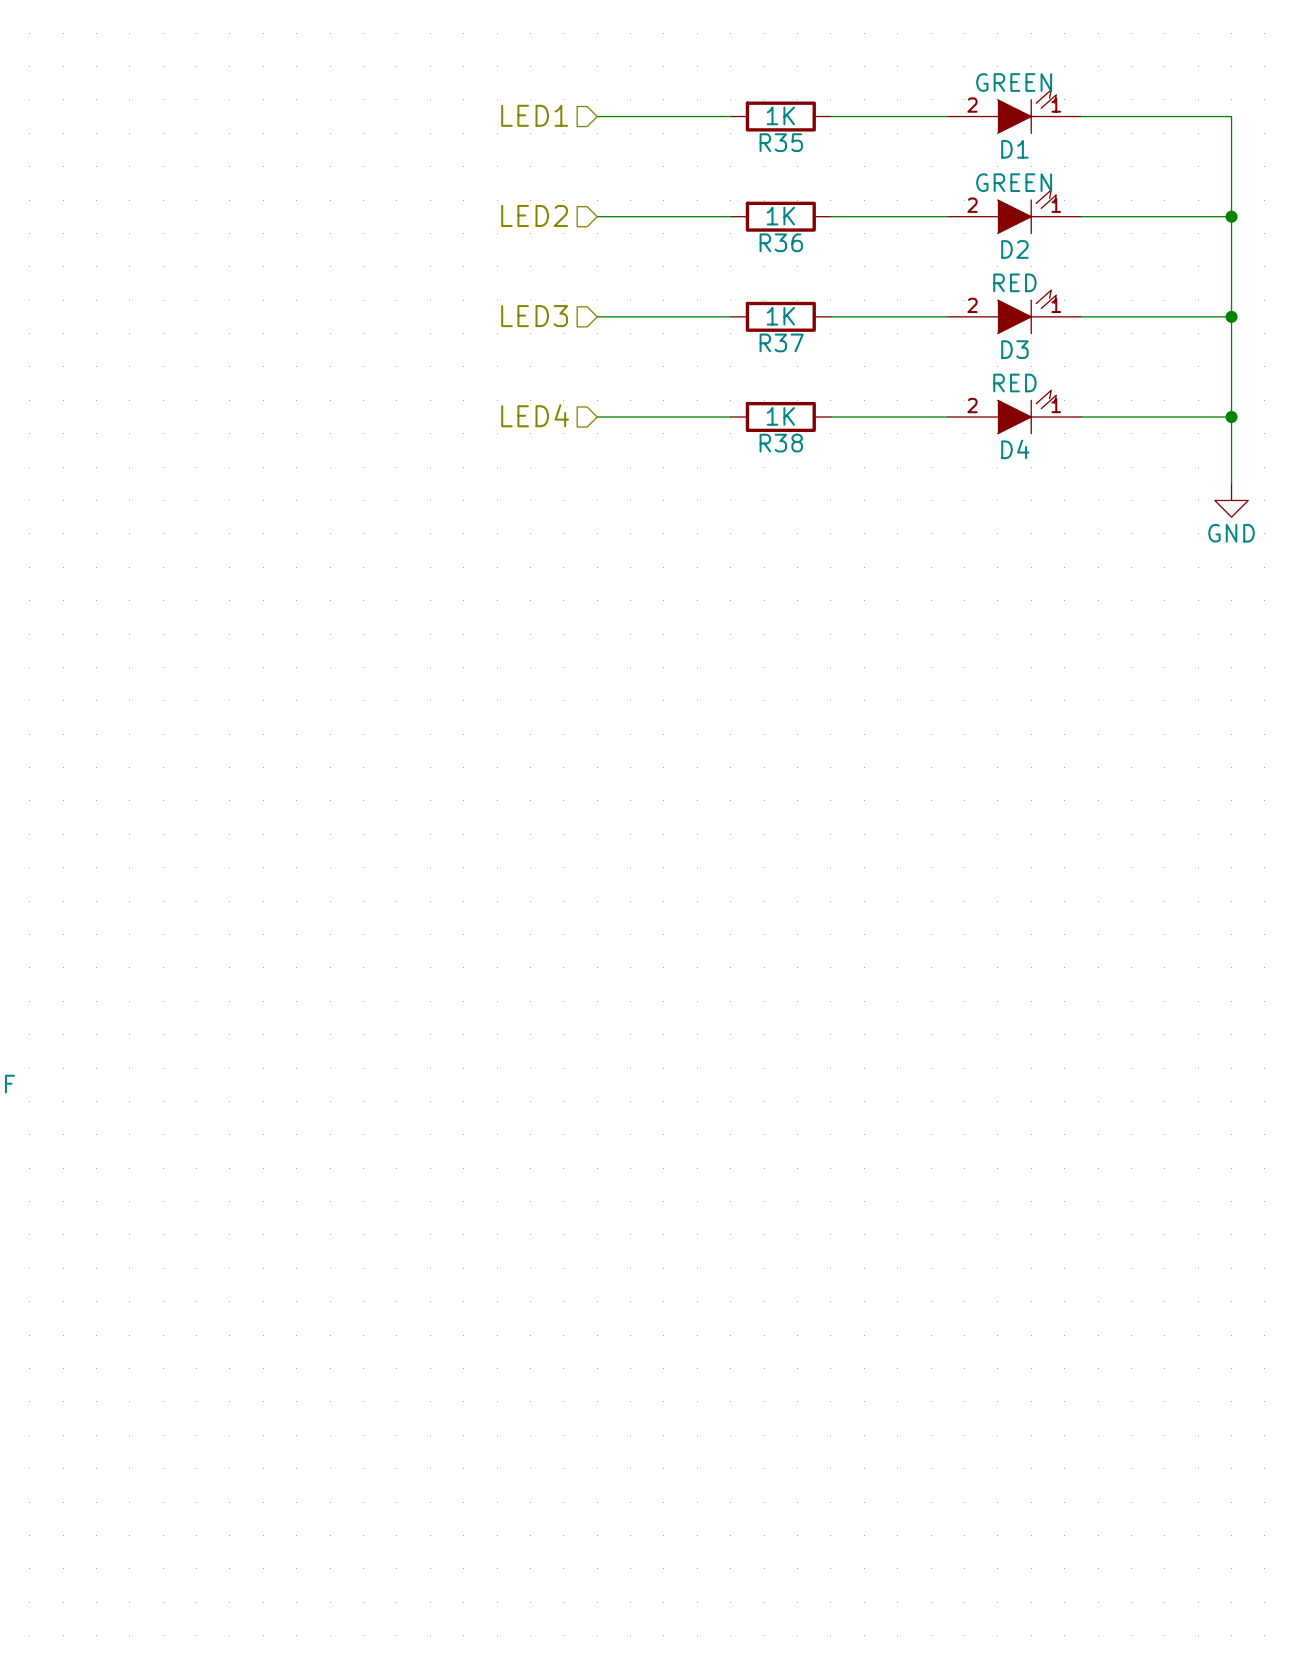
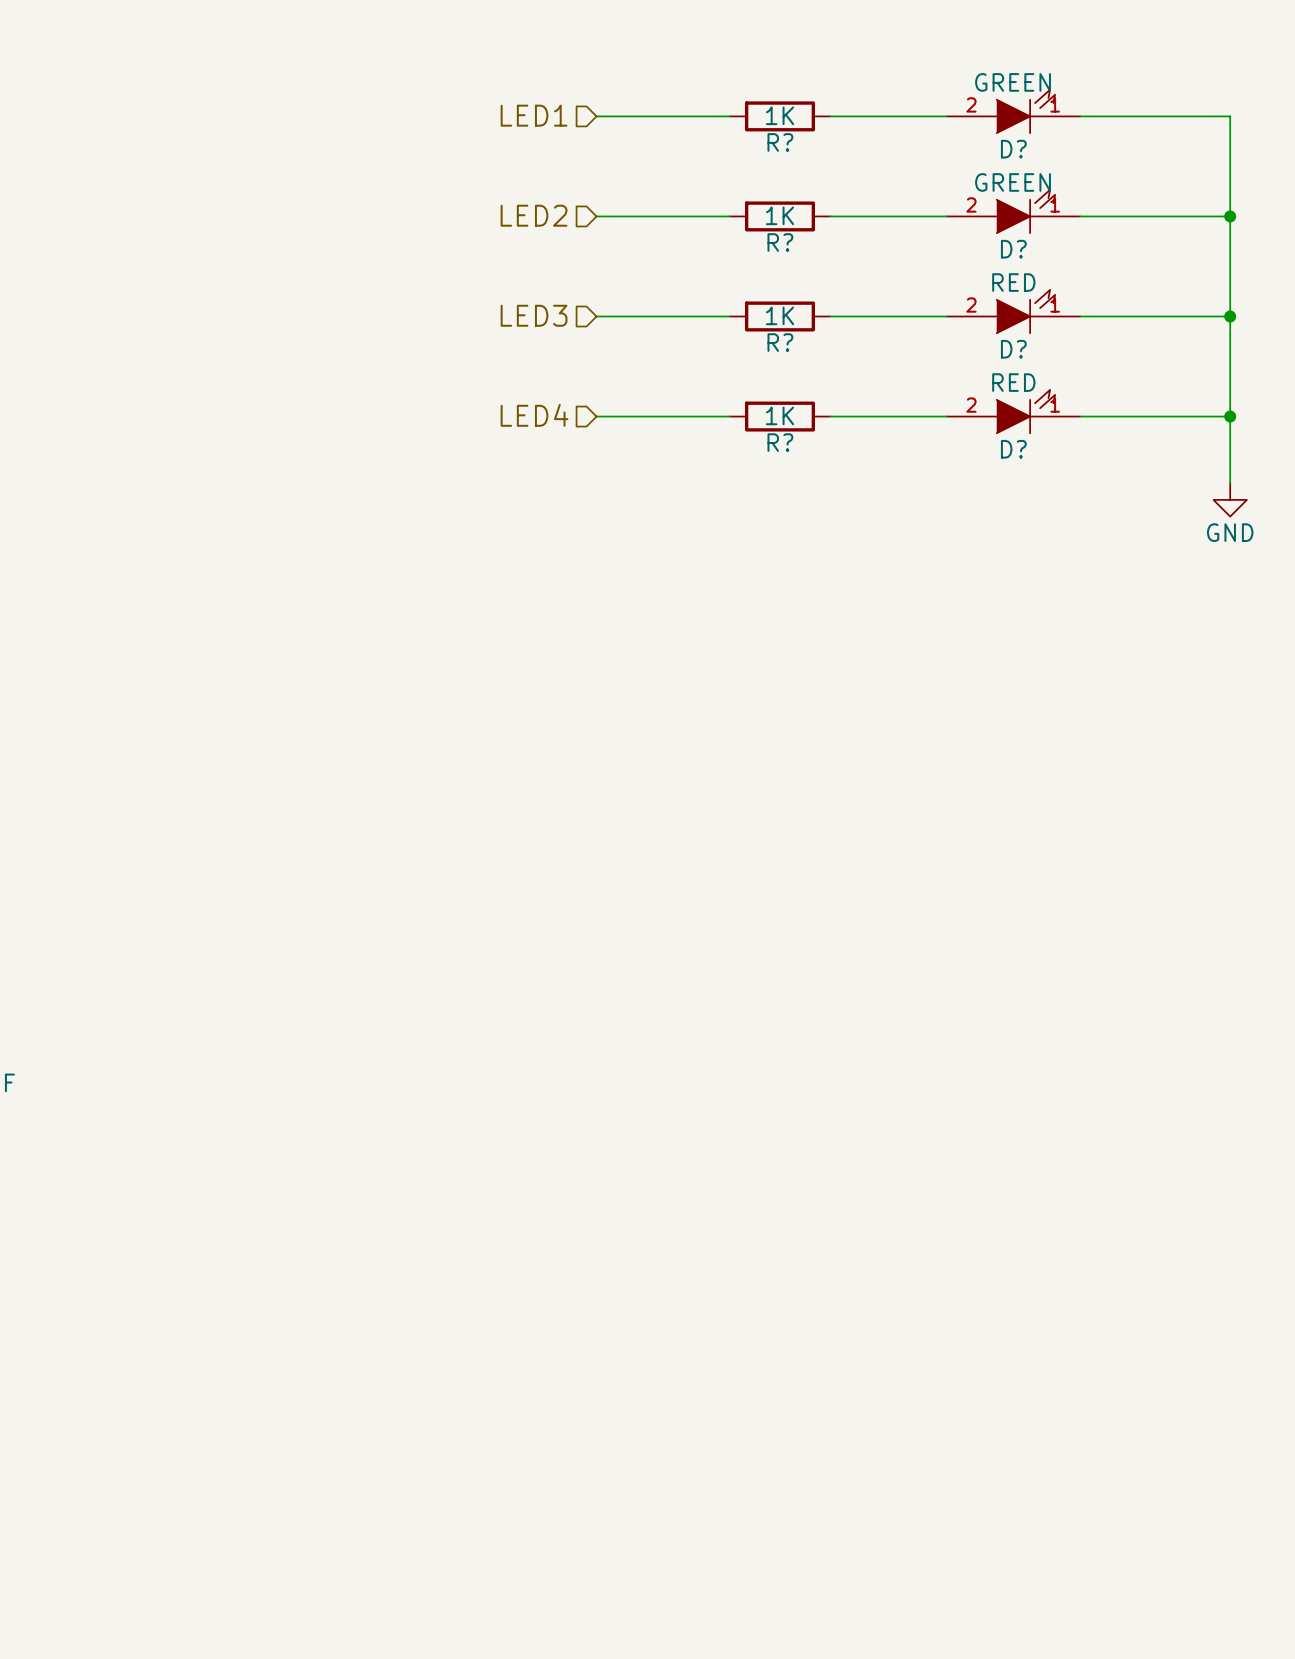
R35 name: R35 (781, 142) -> R? (780, 142)
D1 name: D1 (1014, 149) -> D? (1013, 149)
R36 name: R36 (781, 242) -> R? (780, 242)
D2 name: D2 (1014, 249) -> D? (1013, 249)
R37 name: R37 (781, 342) -> R? (780, 342)
D3 name: D3 (1014, 349) -> D? (1013, 349)
R38 name: R38 (781, 443) -> R? (780, 442)
D4 name: D4 (1015, 449) -> D? (1013, 449)

